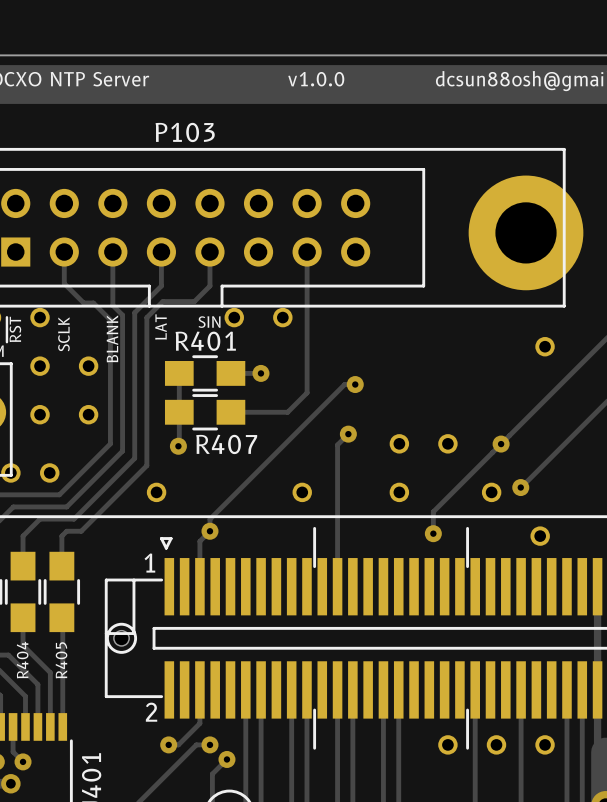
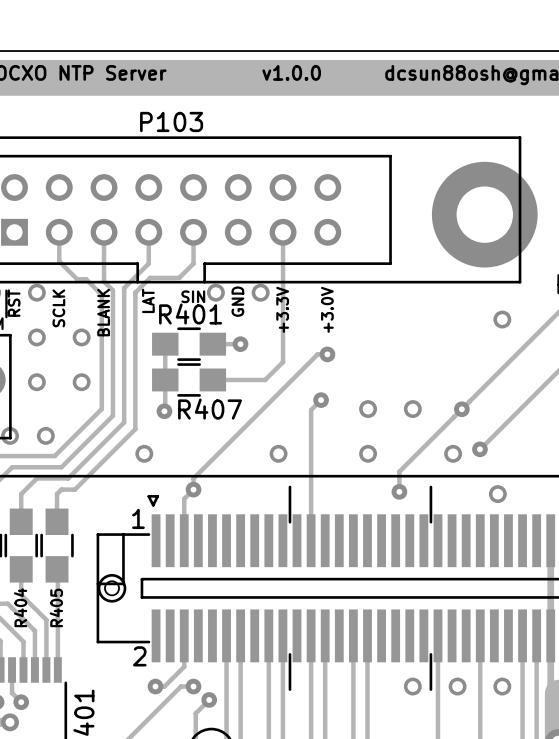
text: none -> GND (237, 301)
text: none -> +3.3V (282, 309)
text: none -> +3.0V (327, 309)

